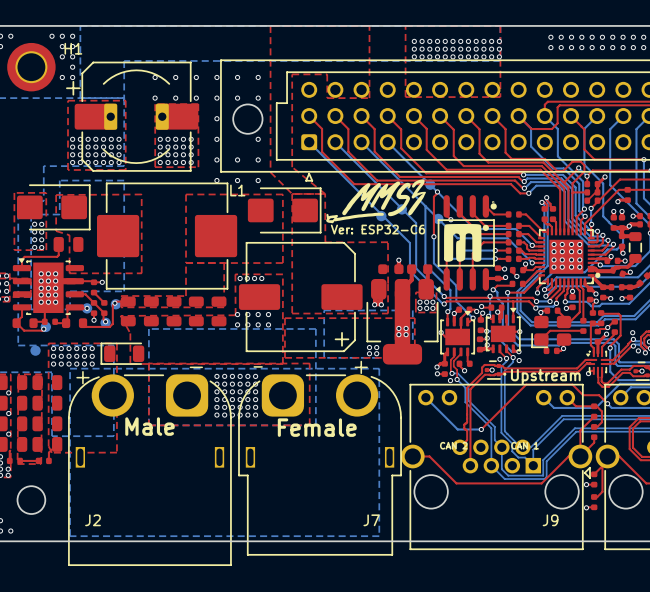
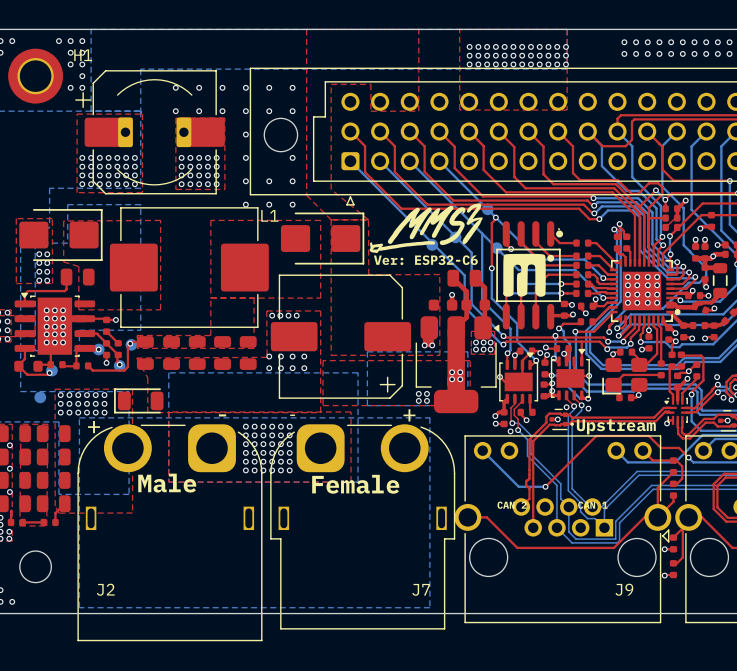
top track: none -> (453, 278) (466, 291) (466, 300)
part: none -> (464, 278)
top track: none -> (475, 278) (484, 287) (484, 300)
part footprint: [61, 318, 88, 329] -> [73, 362, 92, 370]
top track: none -> (88, 365) (94, 370)

